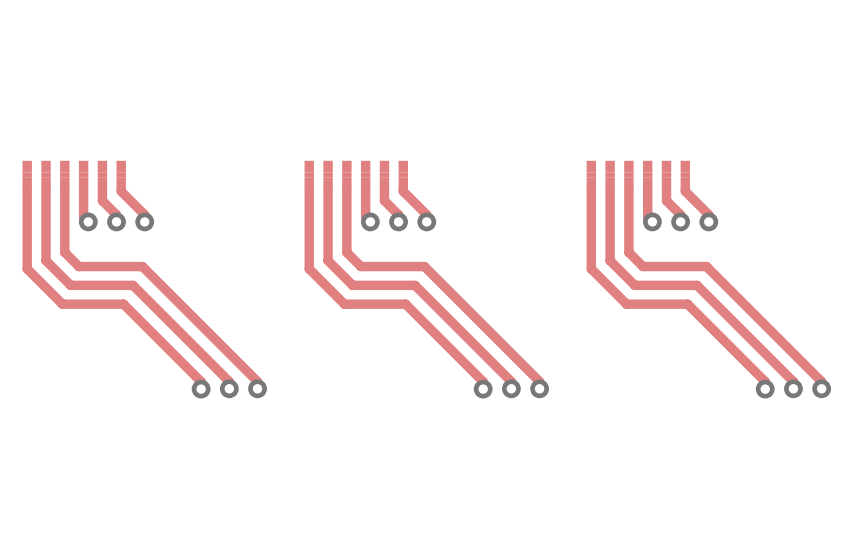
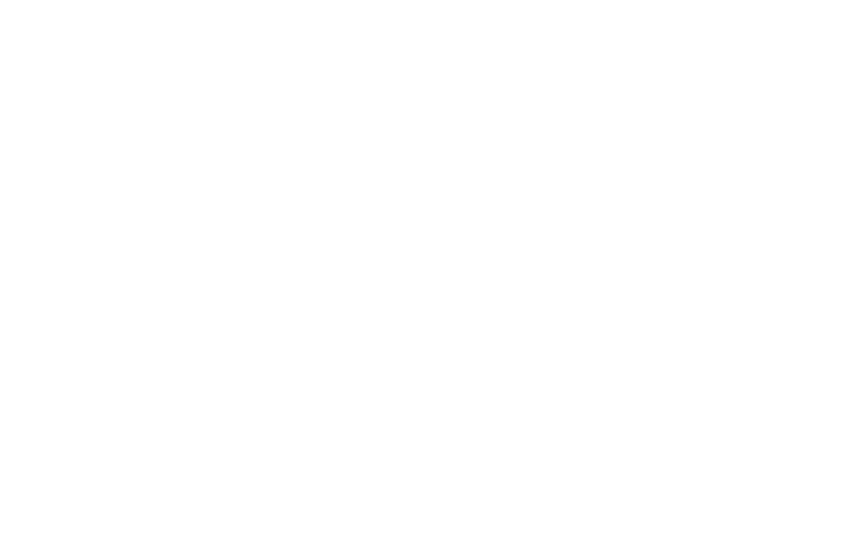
part: (46, 174) -> none
part: (102, 174) -> none
part: (328, 174) -> none
part: (384, 174) -> none
part: (610, 174) -> none
part: (666, 174) -> none
track: (27, 189) (27, 268) (62, 304) (123, 304) (201, 381) (201, 389) -> none
track: (46, 189) (46, 260) (70, 285) (132, 285) (229, 381) (229, 388) -> none
track: (64, 189) (64, 252) (78, 266) (142, 266) (257, 381) (257, 388) -> none
track: (83, 189) (83, 217) (88, 221) -> none
track: (102, 189) (102, 200) (116, 214) (116, 221) -> none
track: (121, 189) (121, 191) (144, 214) (144, 221) -> none
track: (309, 189) (309, 268) (344, 304) (405, 304) (483, 381) (483, 389) -> none
track: (328, 189) (328, 260) (352, 285) (415, 285) (511, 381) (511, 388) -> none
track: (346, 189) (346, 252) (360, 266) (424, 266) (539, 381) (539, 388) -> none
track: (365, 189) (365, 217) (370, 221) -> none
track: (384, 189) (384, 200) (398, 214) (398, 221) -> none
track: (403, 189) (403, 191) (426, 214) (426, 221) -> none
track: (591, 189) (591, 268) (626, 304) (687, 304) (765, 381) (765, 389) -> none
track: (610, 189) (610, 260) (634, 285) (697, 285) (793, 381) (793, 388) -> none
track: (628, 189) (628, 252) (643, 266) (706, 266) (821, 381) (821, 388) -> none
track: (647, 189) (647, 217) (652, 221) -> none
track: (666, 189) (666, 200) (680, 214) (680, 221) -> none
track: (685, 189) (685, 191) (708, 214) (708, 221) -> none
via: (88, 221) -> none
via: (116, 221) -> none
via: (144, 221) -> none
via: (370, 221) -> none
via: (398, 221) -> none
via: (426, 221) -> none
via: (652, 221) -> none
via: (680, 221) -> none
via: (708, 221) -> none
via: (229, 388) -> none
via: (257, 388) -> none
via: (511, 388) -> none
via: (539, 388) -> none
via: (793, 388) -> none
via: (821, 388) -> none
via: (201, 389) -> none
via: (483, 389) -> none
via: (765, 389) -> none

